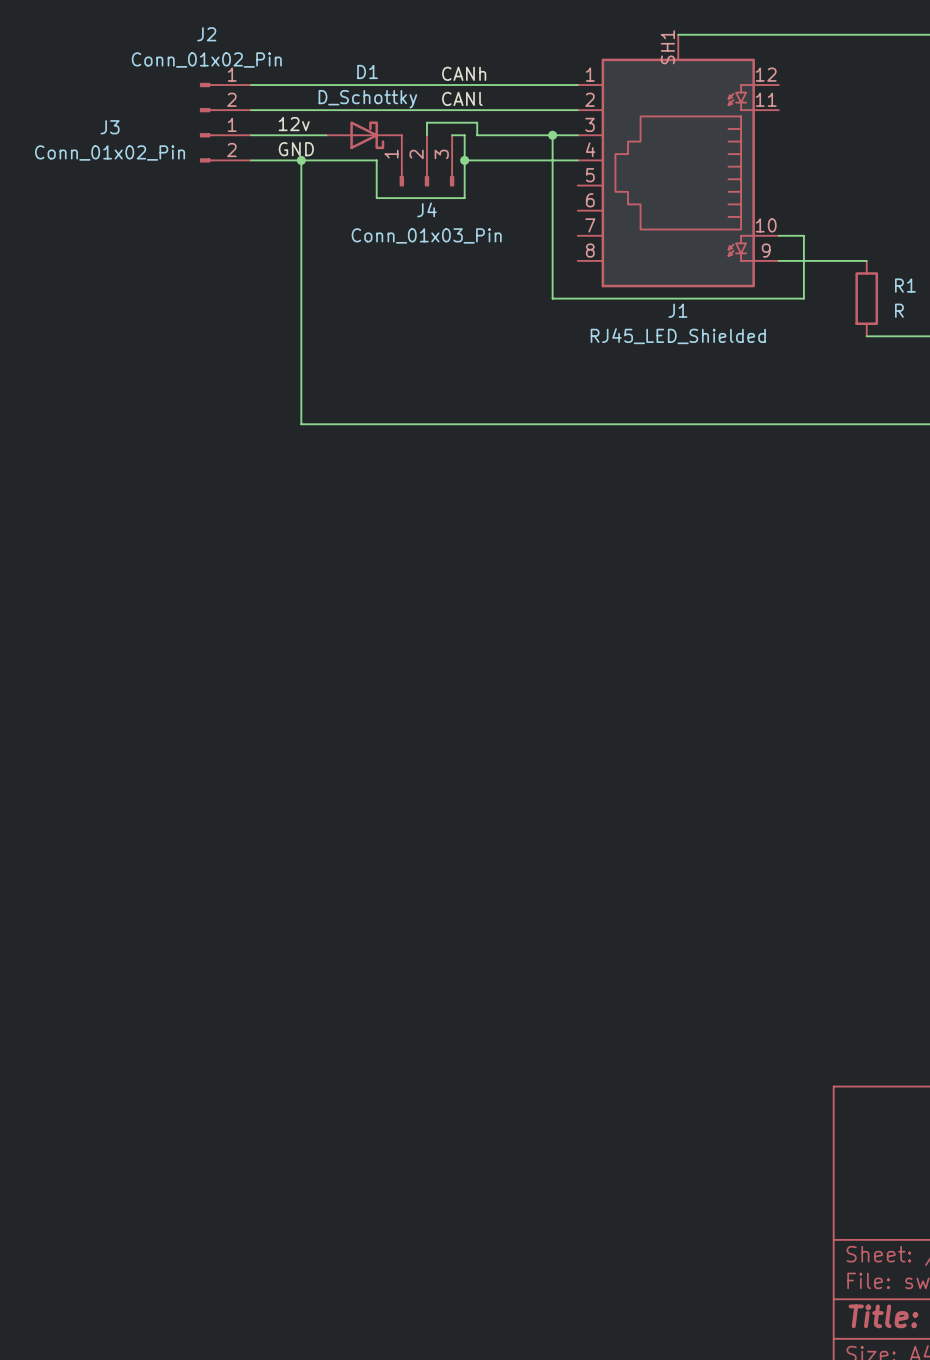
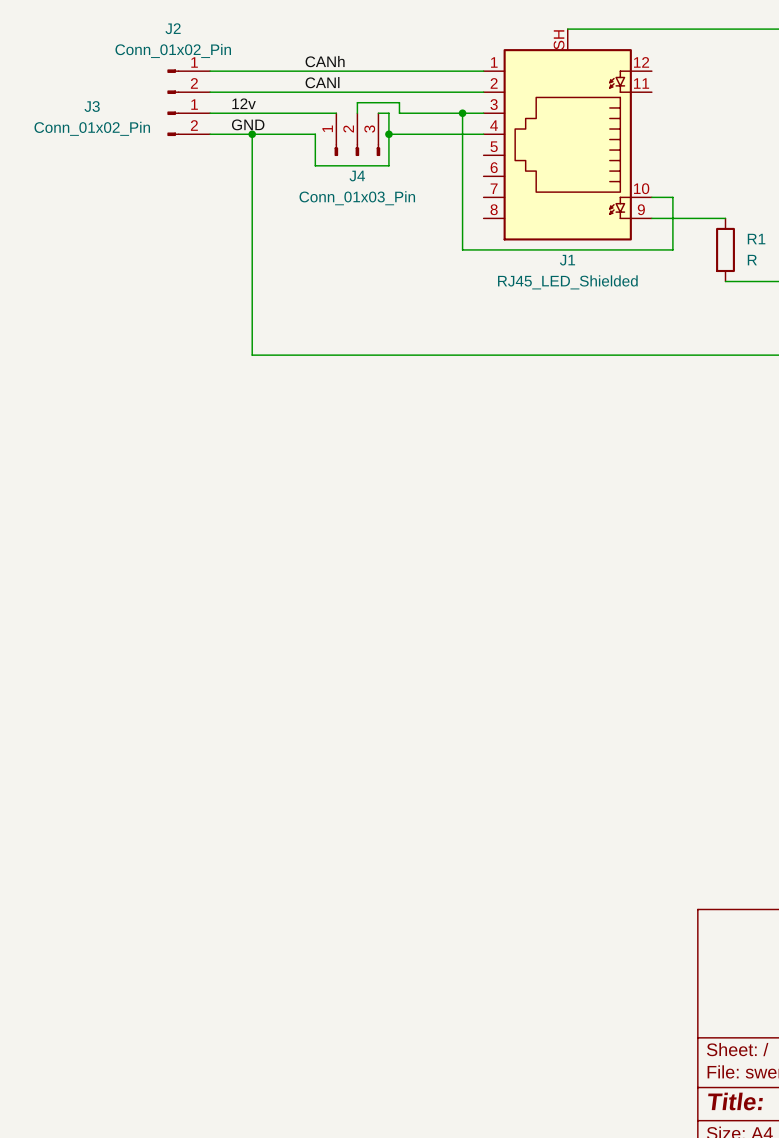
J1 pin number: SH1 (667, 47) -> SH (559, 39)
label position: CANh (464, 73) -> CANh (325, 61)
label position: CANl (462, 98) -> CANl (322, 82)
D1: D_Schottky (364, 135) -> none

